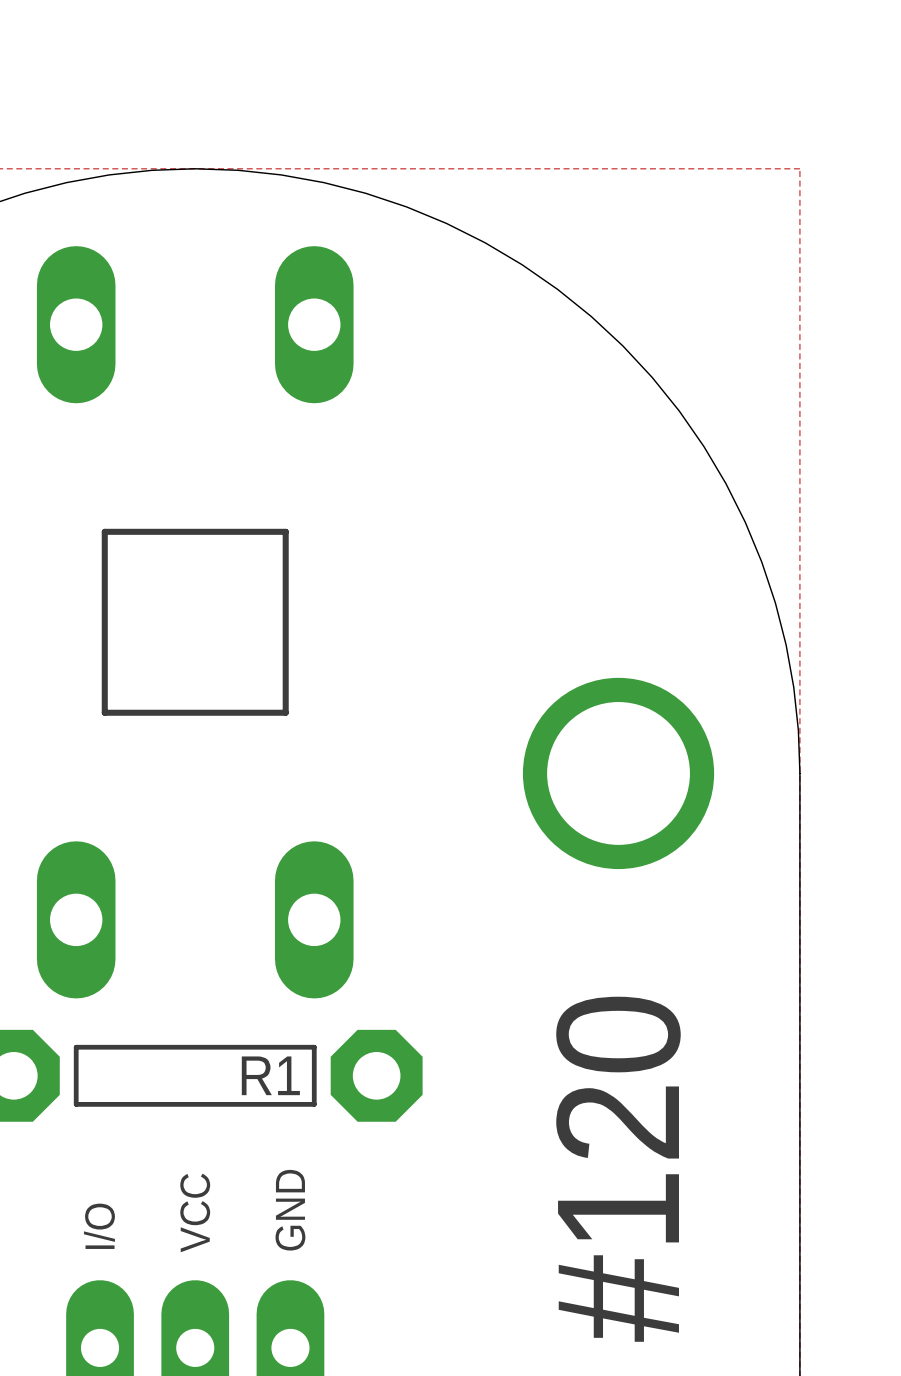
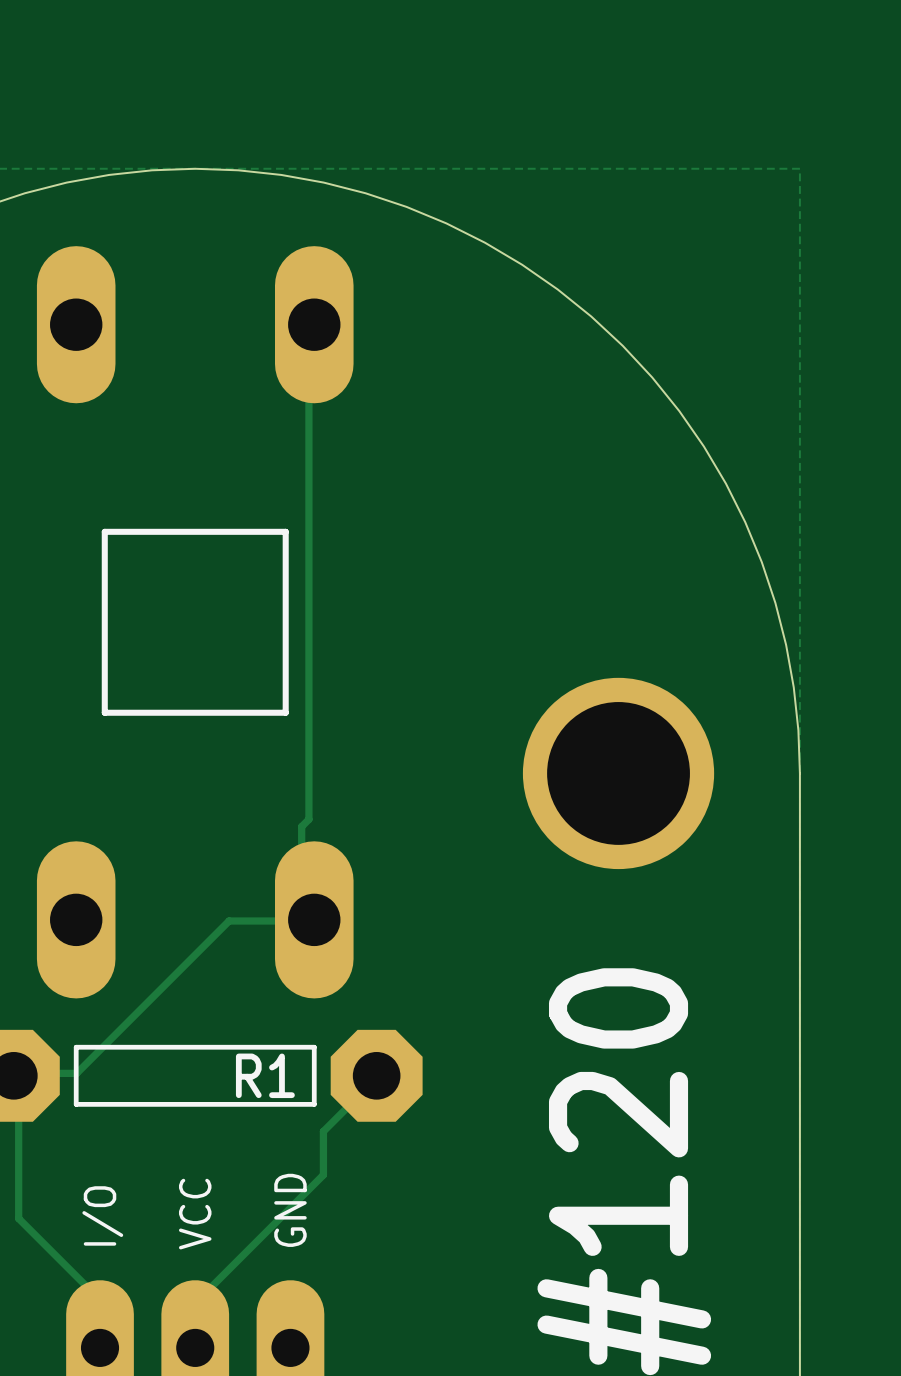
track: none -> (314, 324) (308, 325) (308, 819) (301, 826) (301, 921) (314, 919) (308, 921) (229, 921) (76, 1073) (18, 1073) (13, 1075) (18, 1080) (18, 1218) (98, 1298) (100, 1347)
track: none -> (376, 1075) (374, 1080) (323, 1131) (323, 1174) (200, 1298) (200, 1341) (195, 1347)

